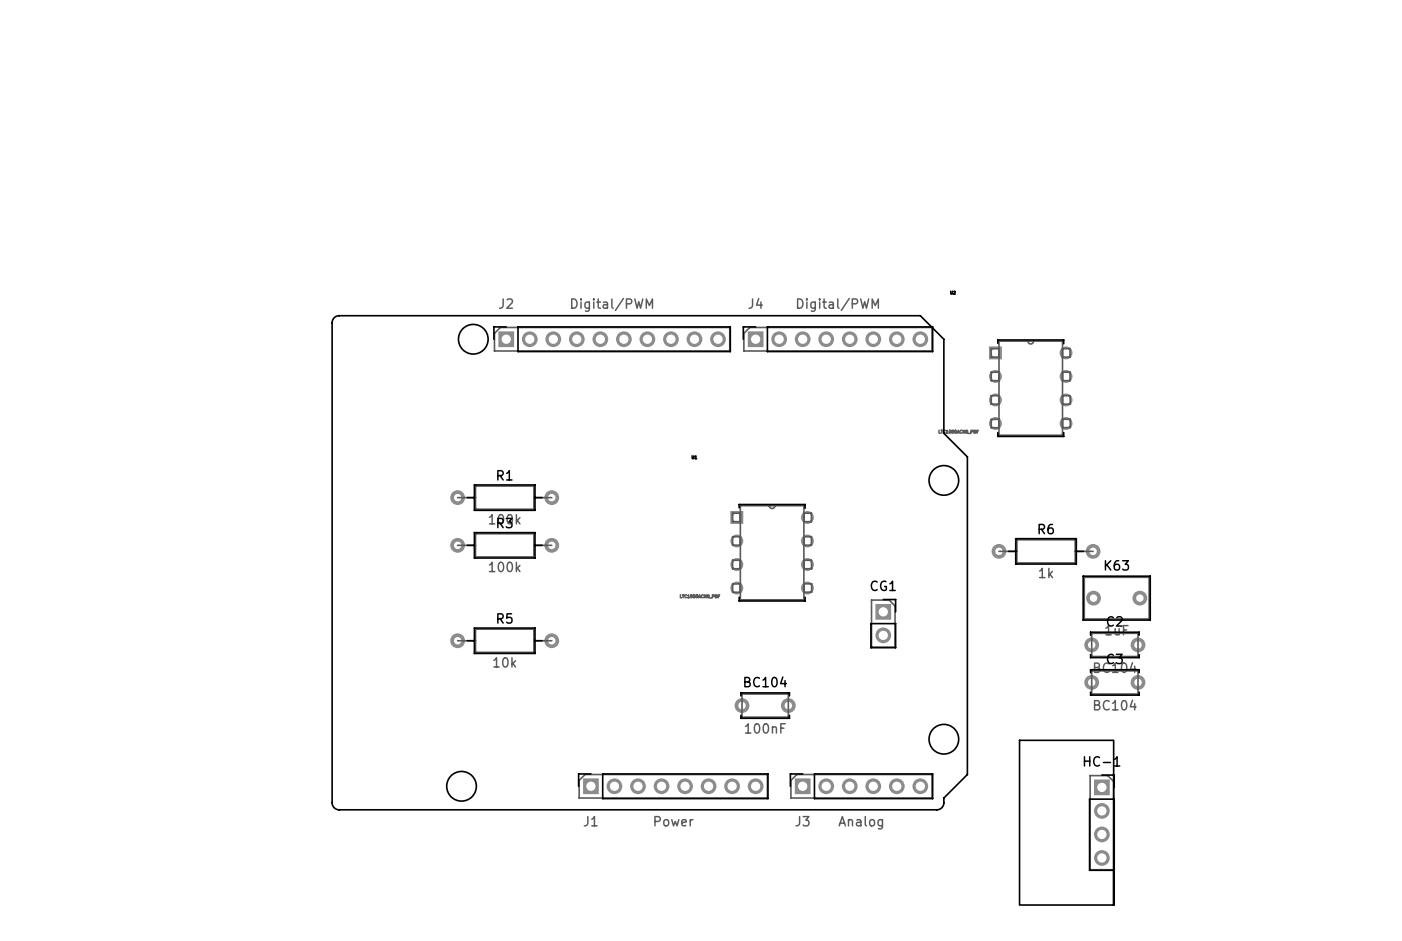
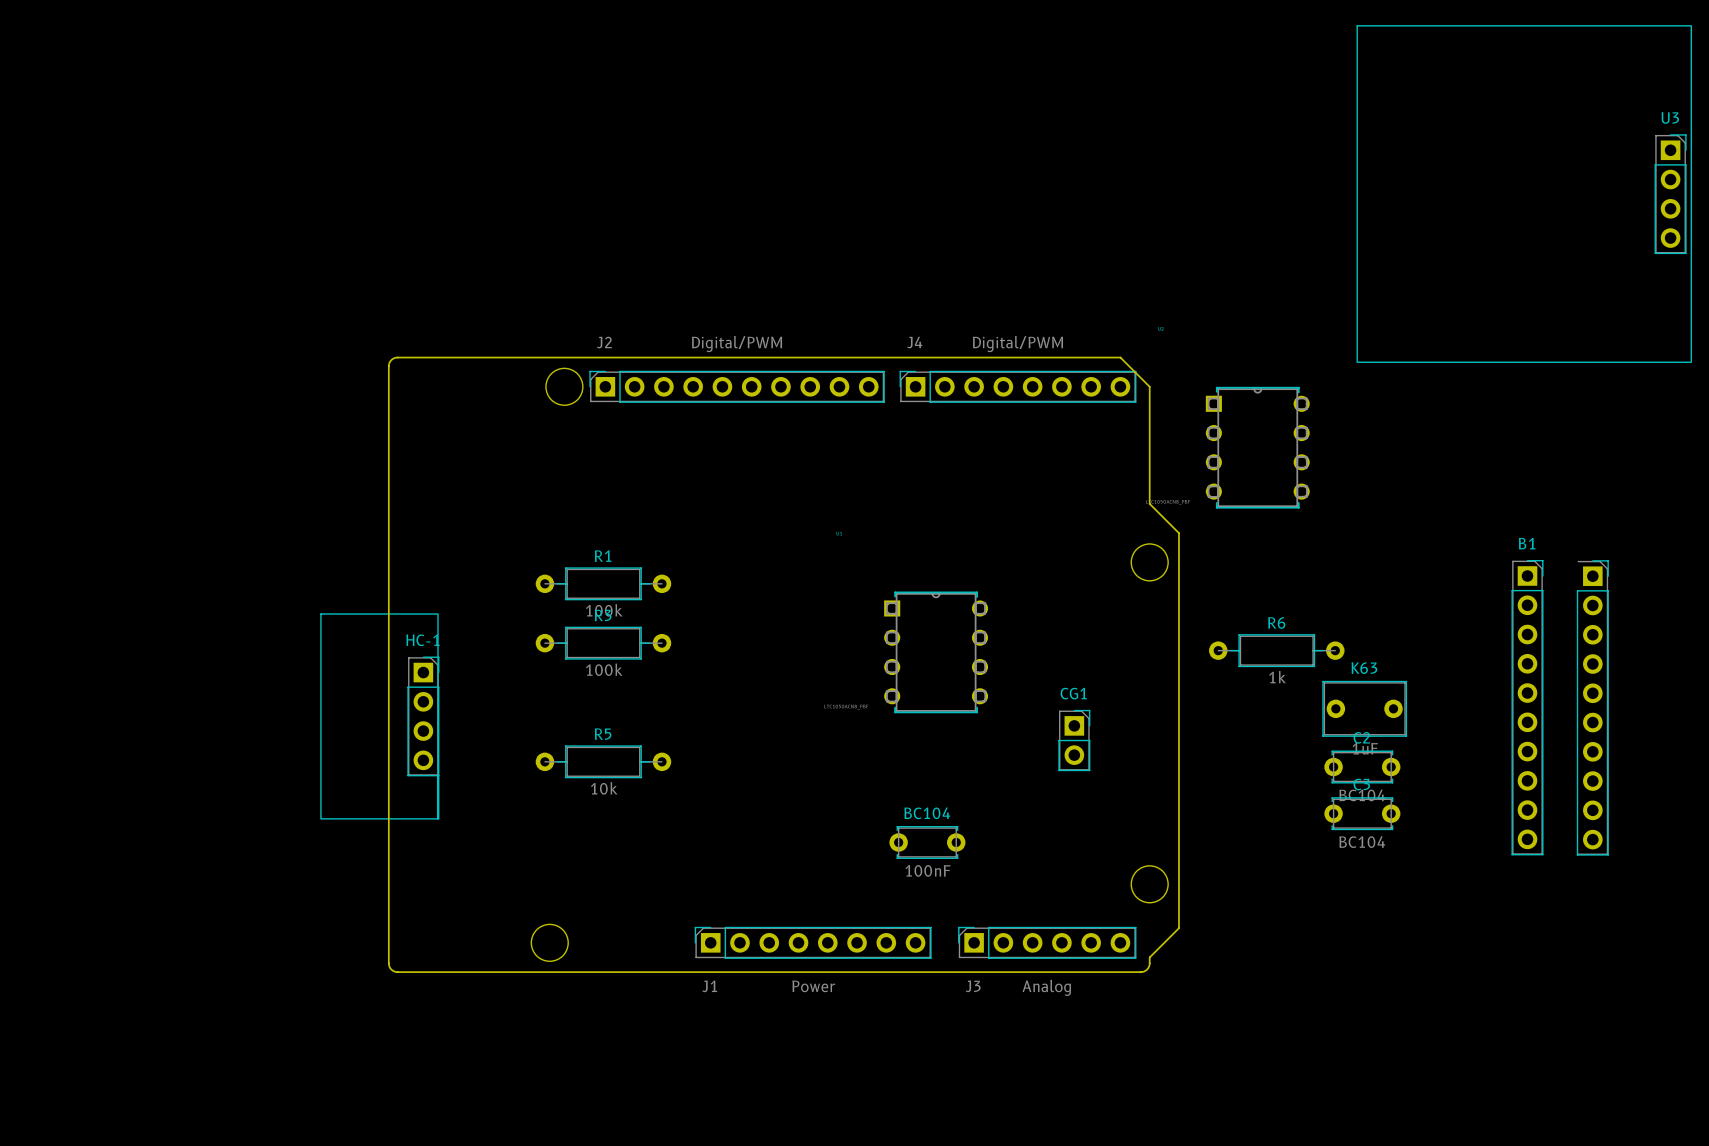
U3: none -> (1524, 194)
B1: none -> (1560, 707)
HC-1 position: (1066, 822) -> (379, 716)

